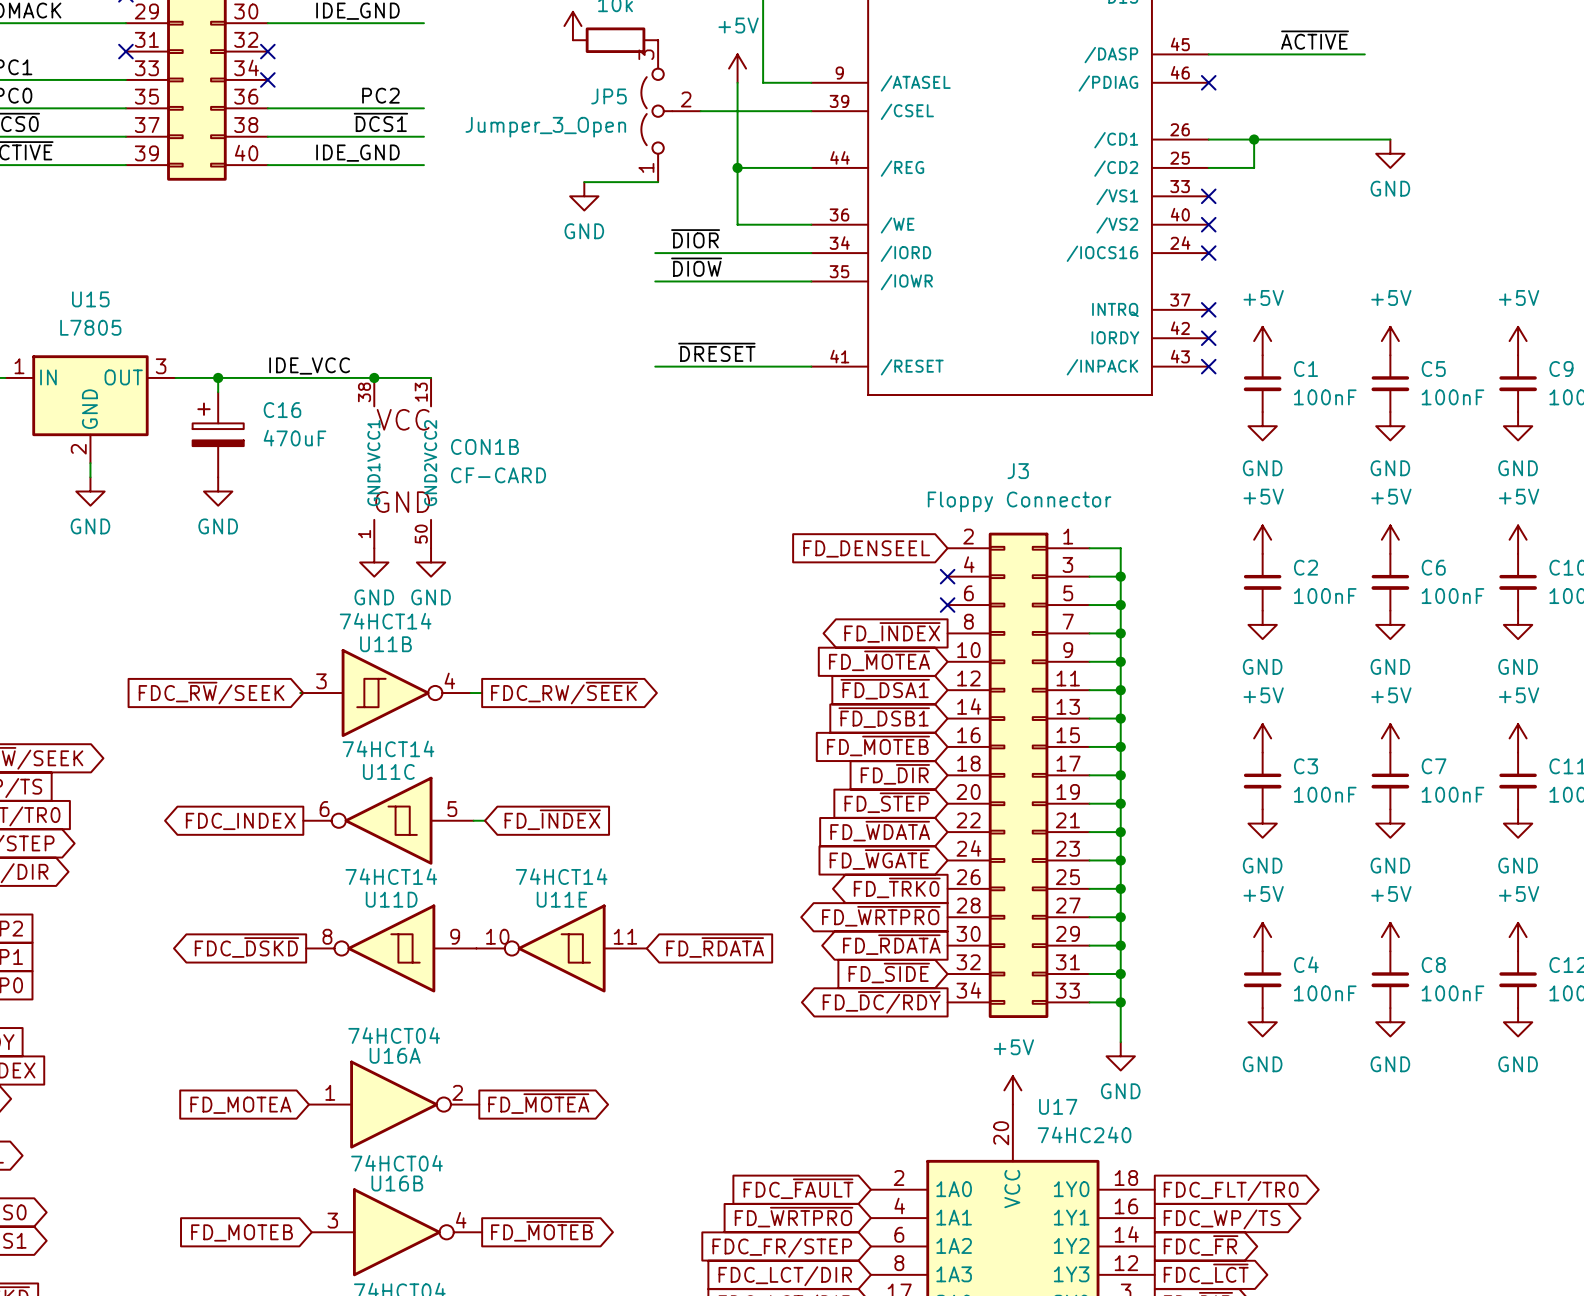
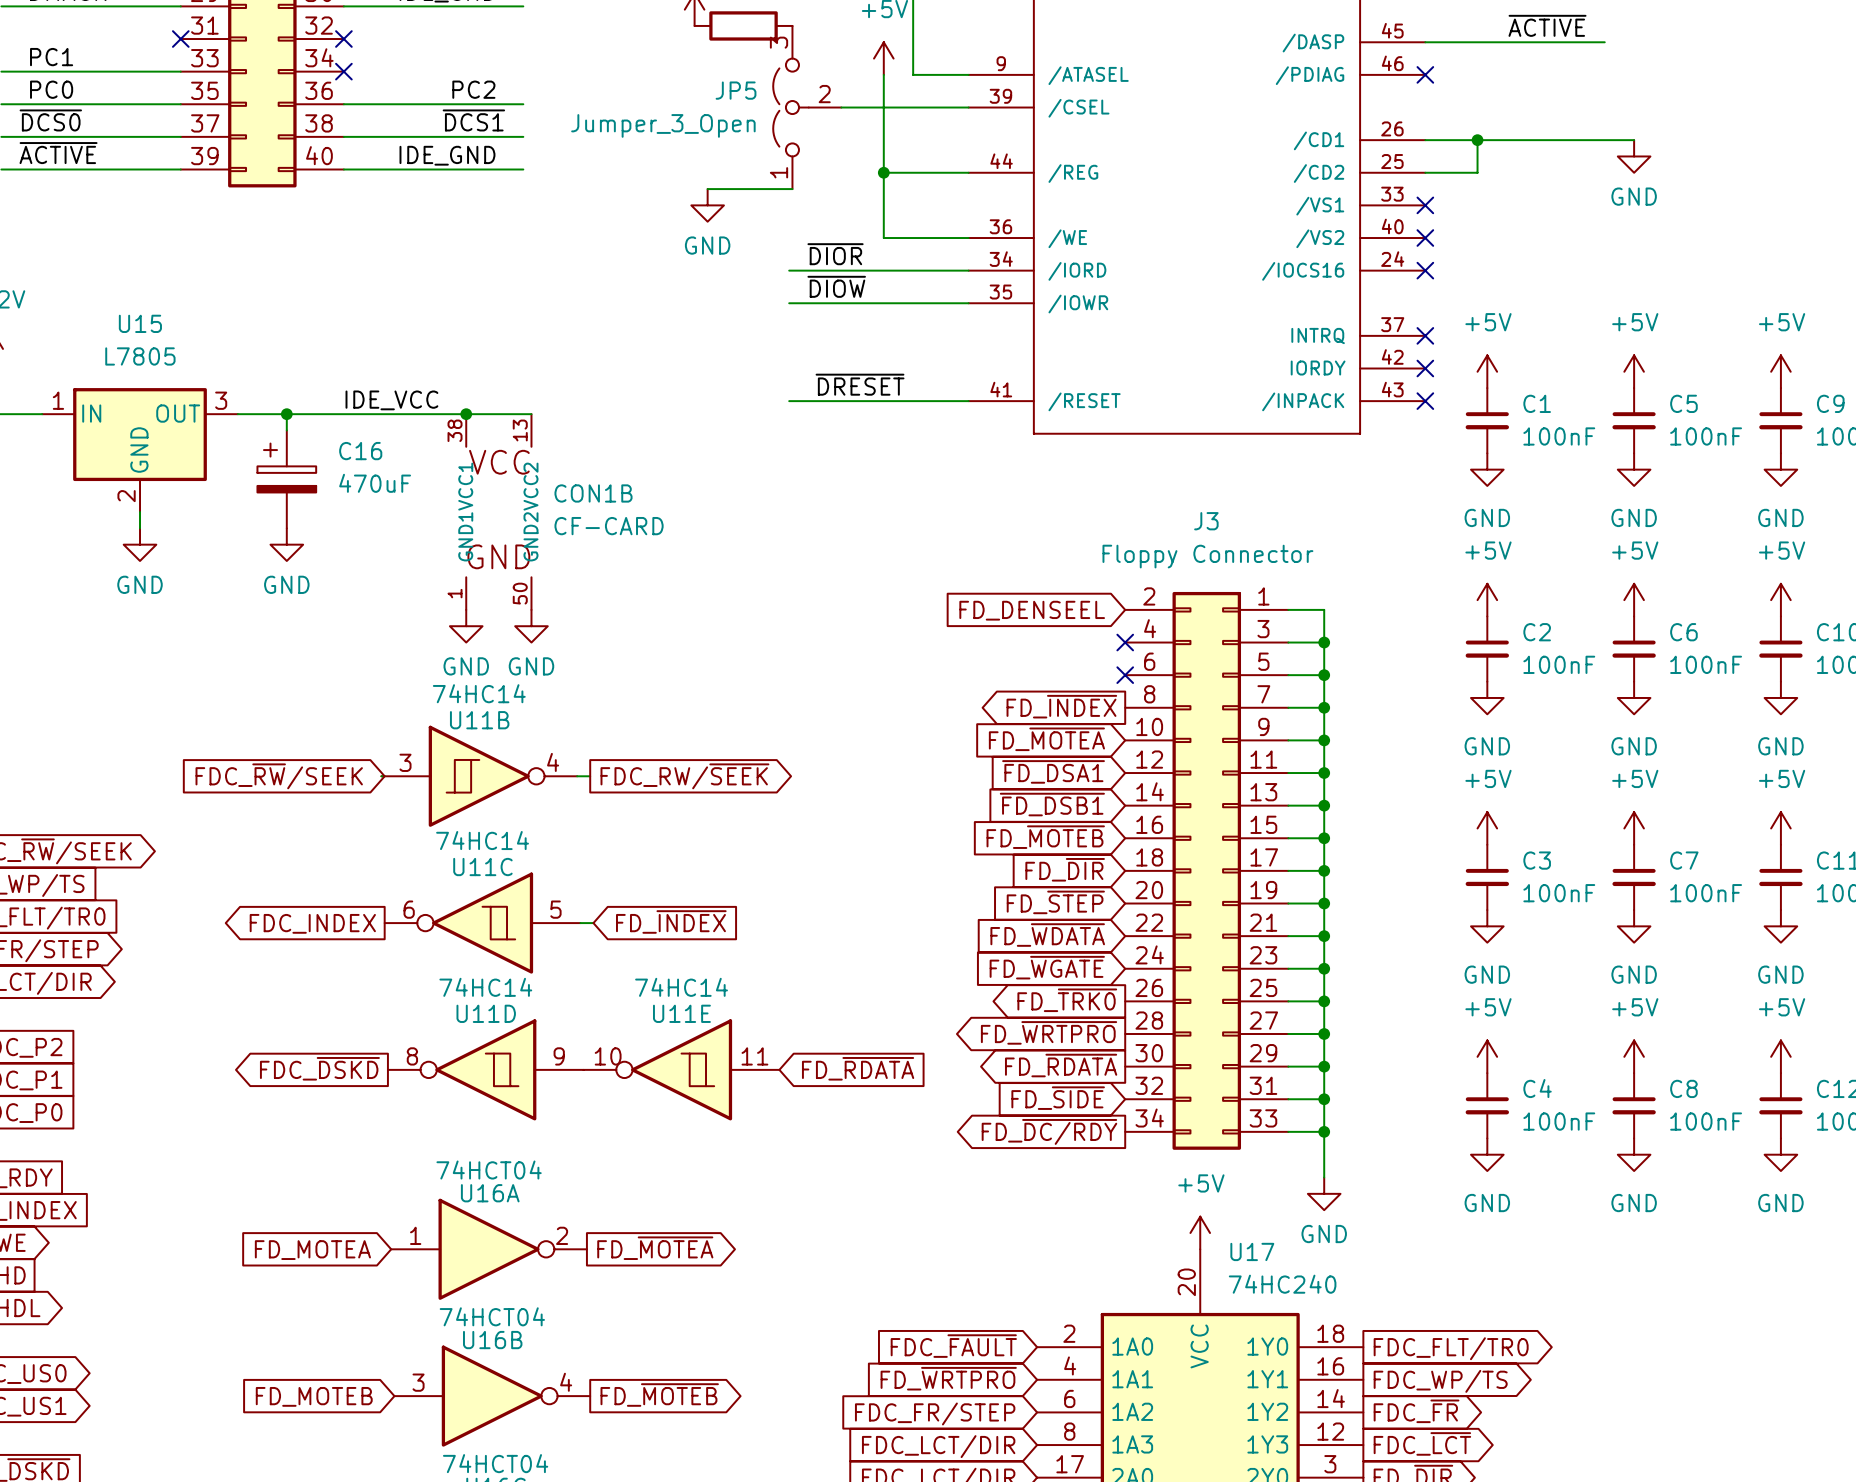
U11B value: 74HCT14 (385, 621) -> 74HC14 (479, 693)
U11C value: 74HCT14 (388, 748) -> 74HC14 (482, 840)
U11D value: 74HCT14 (391, 876) -> 74HC14 (485, 987)
U11E value: 74HCT14 (561, 876) -> 74HC14 (681, 987)

